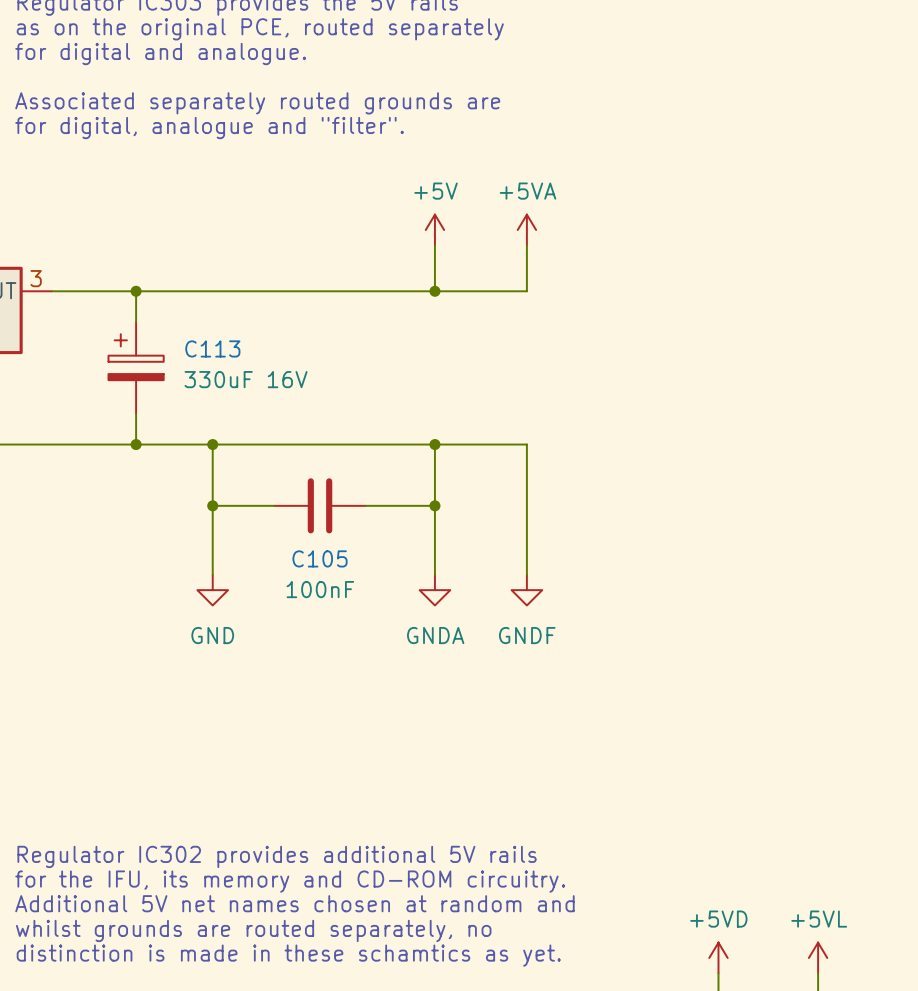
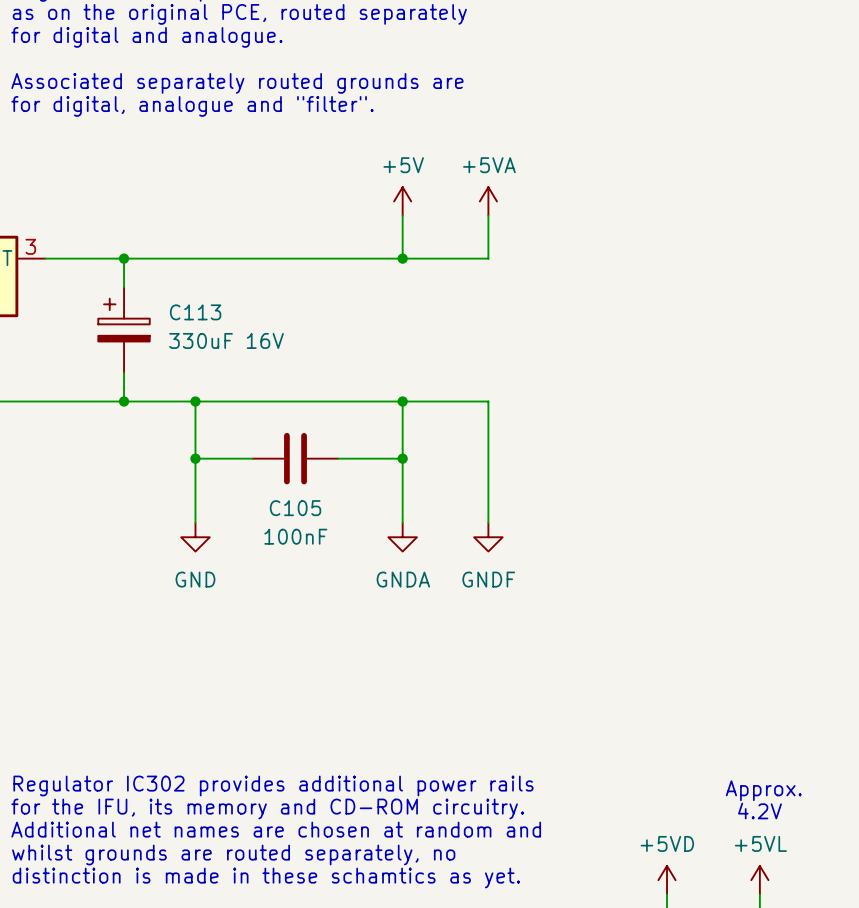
text: Regulator IC302 provides additional 5V rails (277, 856) -> Regulator IC302 provides additional power rails (273, 785)
text: none -> Approx. (763, 790)
text: none -> 4.2V (759, 810)
text: Additional 5V net names chosen at random and (294, 903) -> Additional net names are chosen at random and (276, 829)

